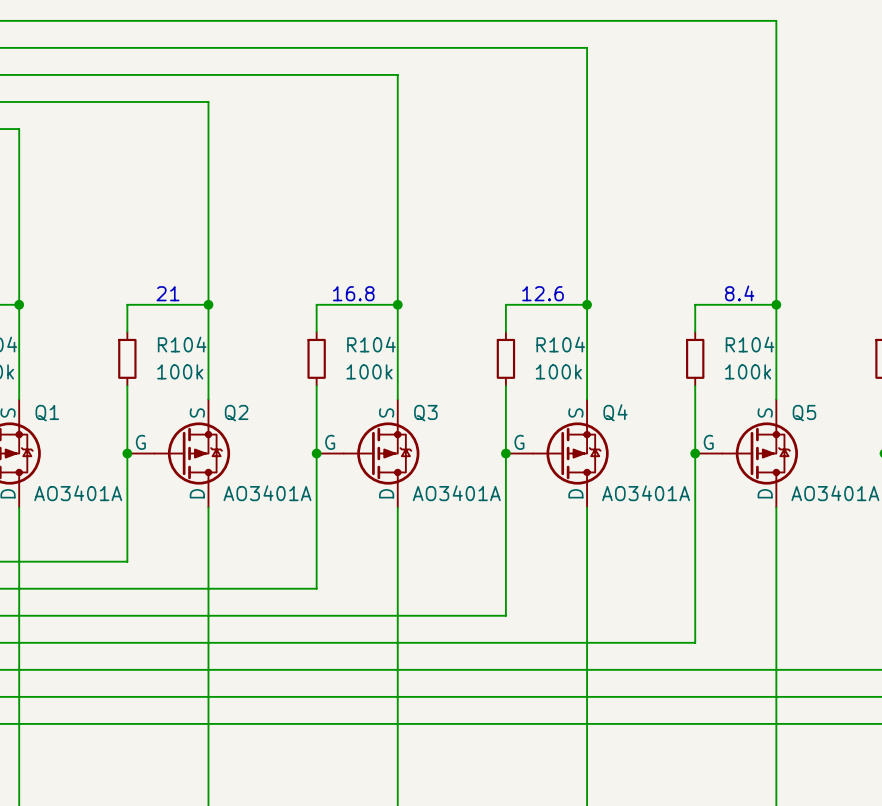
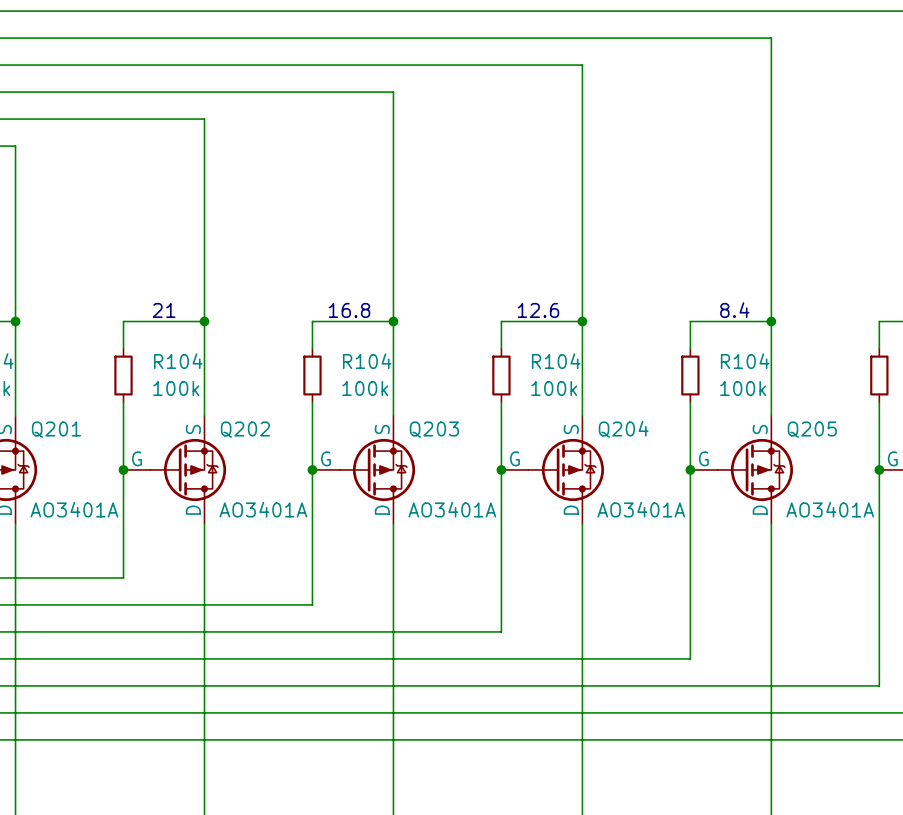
Q4 name: Q4 (615, 412) -> Q204 (623, 429)
Q1 name: Q1 (47, 413) -> Q201 (56, 429)
Q2 name: Q2 (236, 413) -> Q202 (245, 429)
Q3 name: Q3 (425, 413) -> Q203 (434, 429)
Q5 name: Q5 (804, 413) -> Q205 (812, 429)

